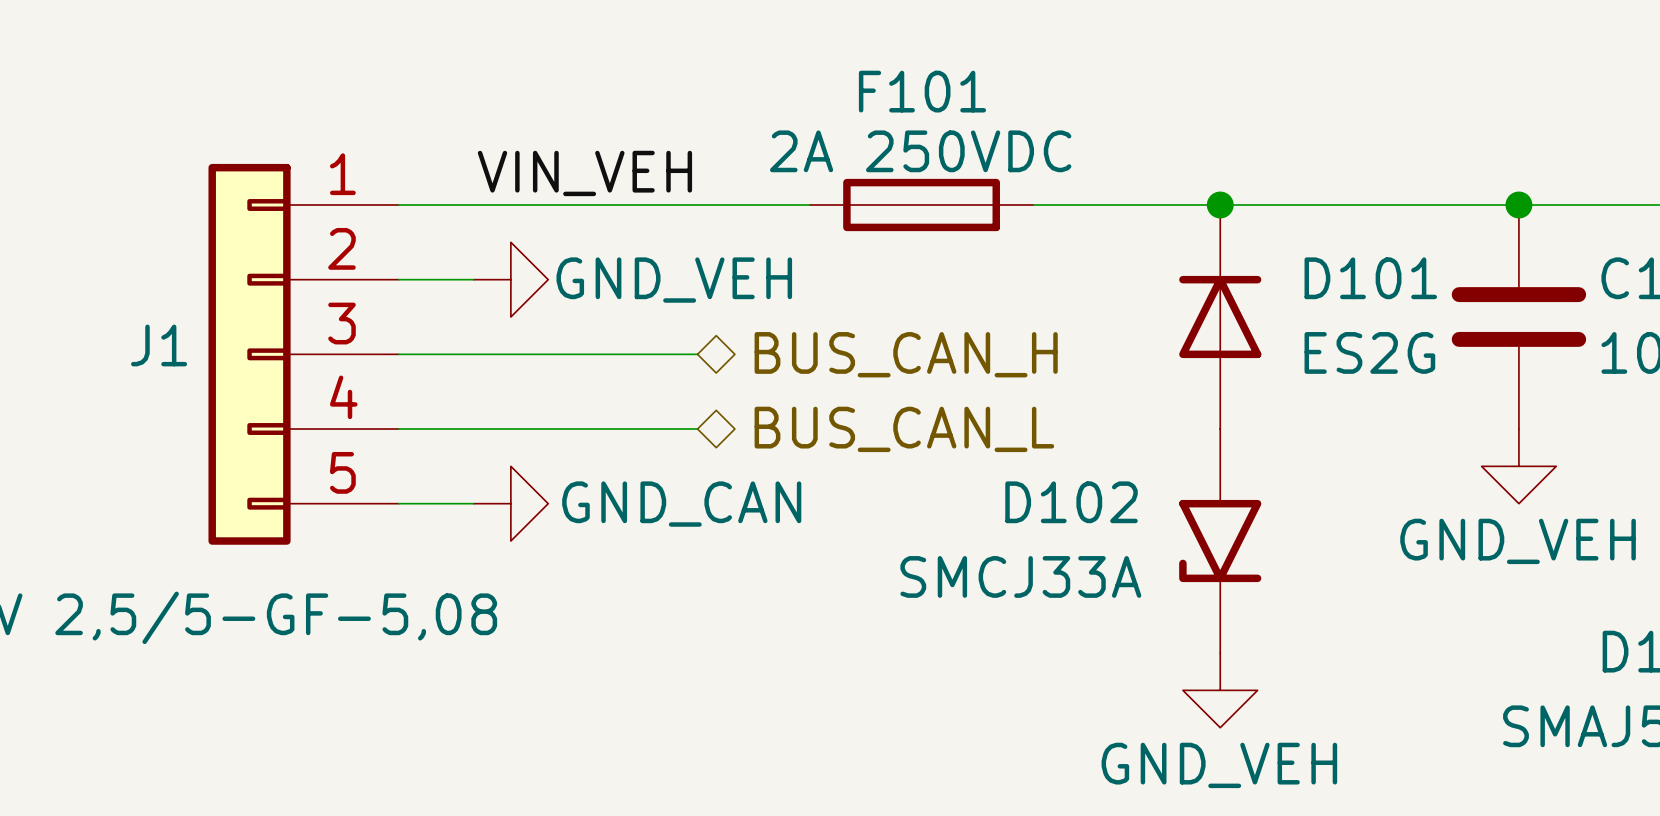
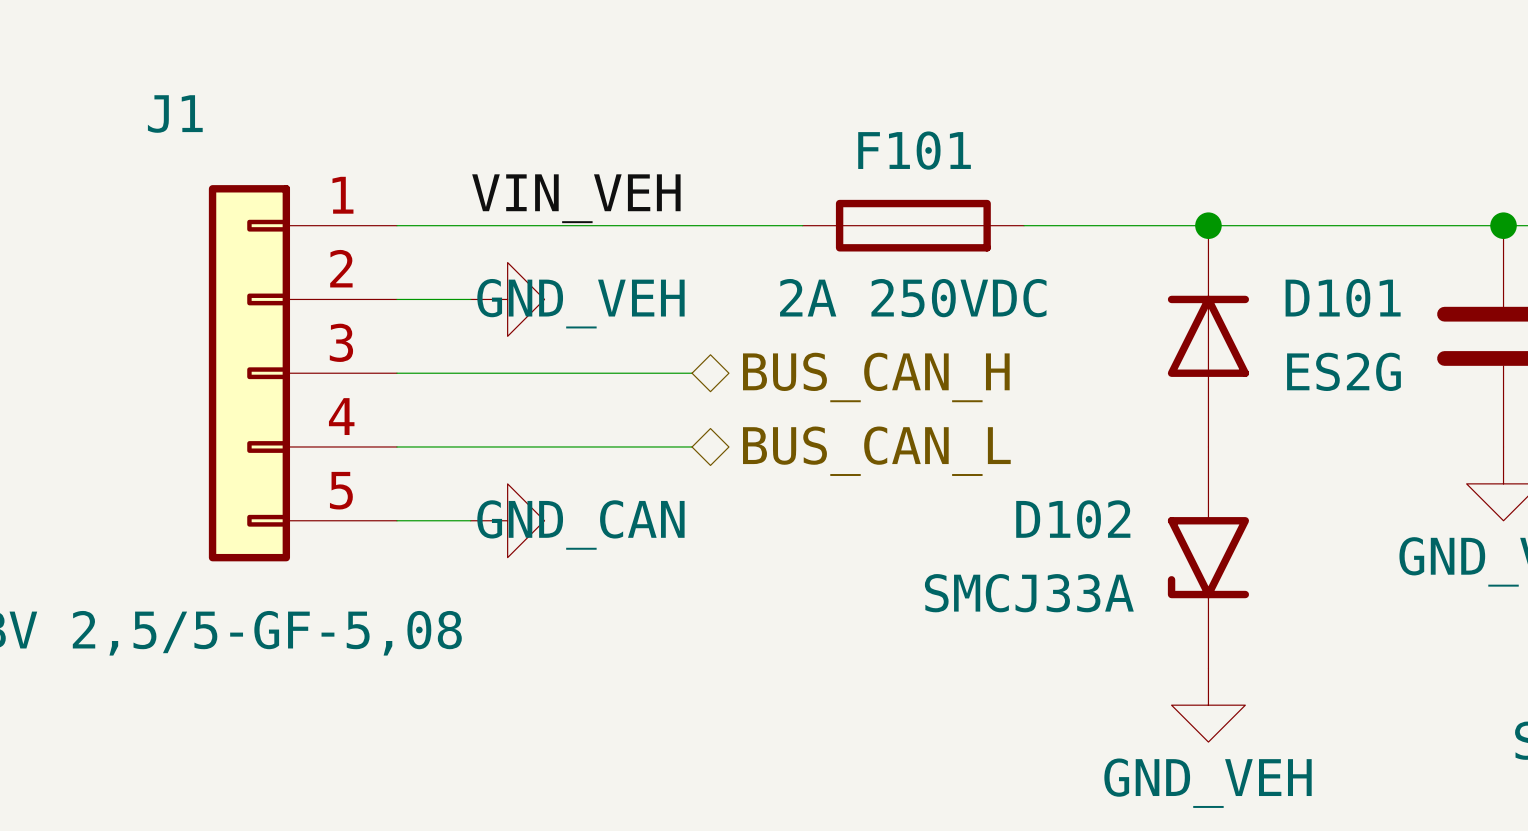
F101 name position: F101 (922, 91) -> F101 (914, 150)
F101 value position: 2A 250VDC (920, 151) -> 2A 250VDC (913, 298)
power symbol text position: GND_VEH (674, 280) -> GND_VEH (580, 303)
J1 name position: J1 (159, 345) -> J1 (175, 114)
power symbol text position: GND_CAN (681, 504) -> GND_CAN (580, 525)

